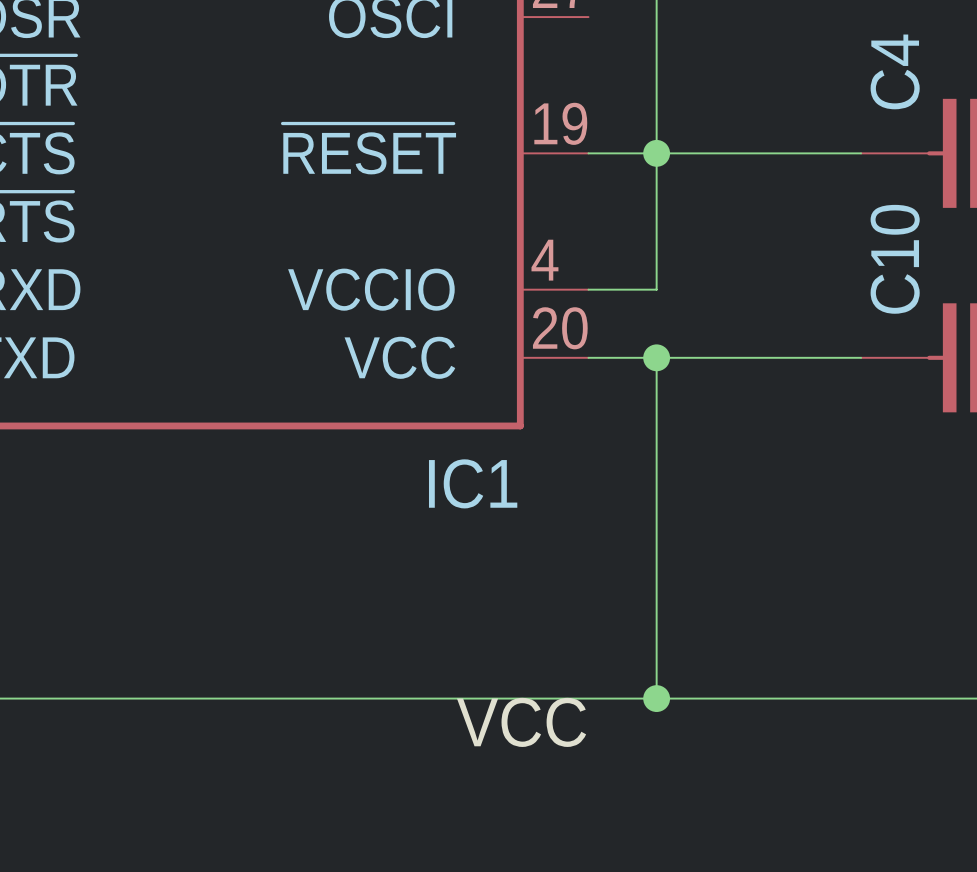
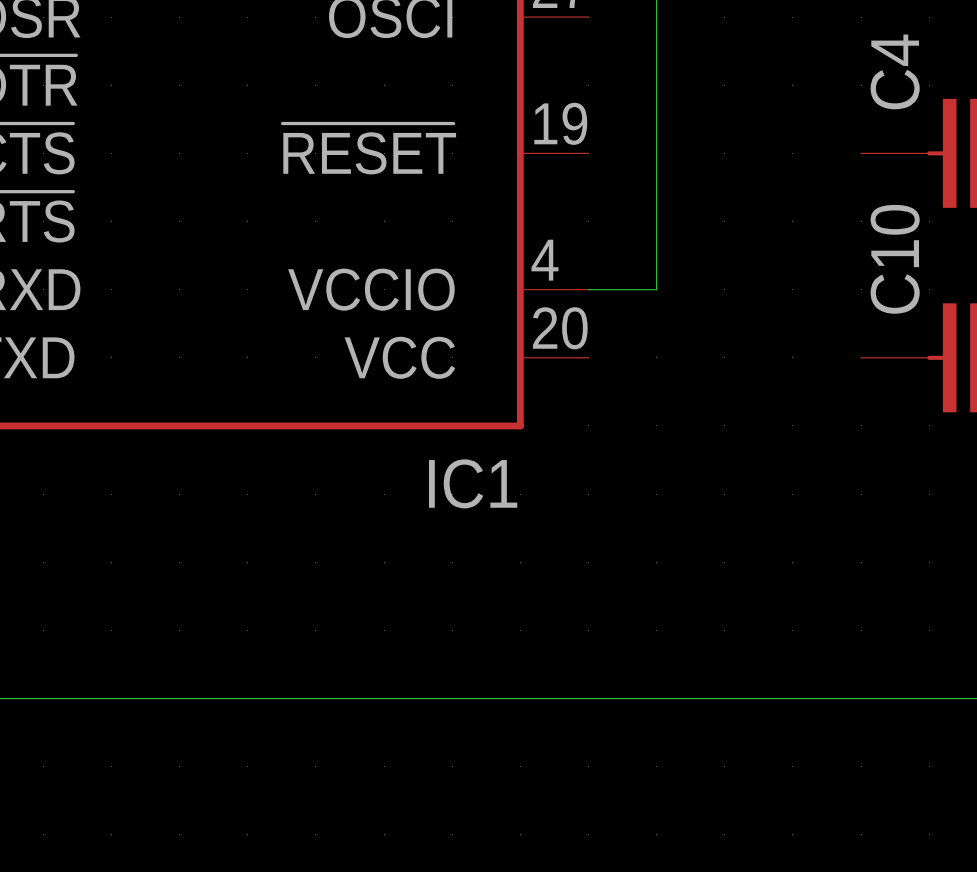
wire: (588, 153) (861, 153) -> none
junction: (656, 153) -> none
wire: (588, 357) (861, 357) -> none
wire: (656, 357) (656, 698) -> none
junction: (656, 357) -> none
junction: (656, 698) -> none
label: VCC (521, 722) -> none

